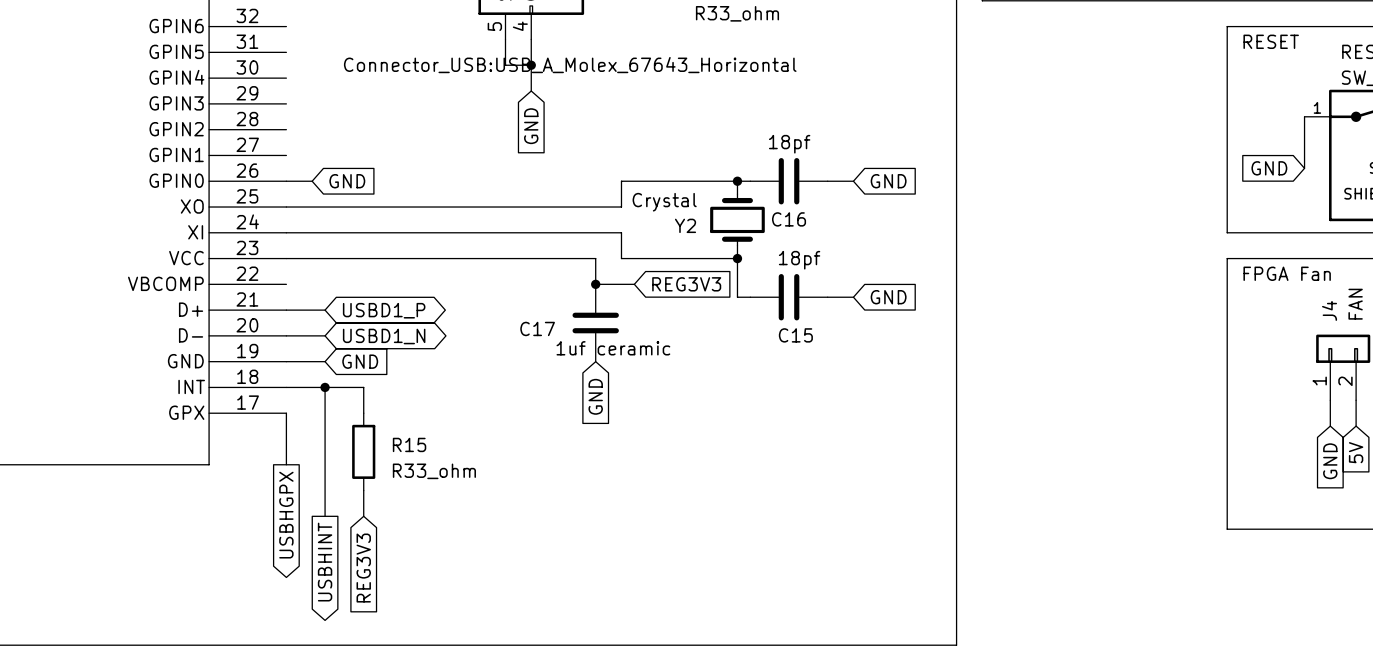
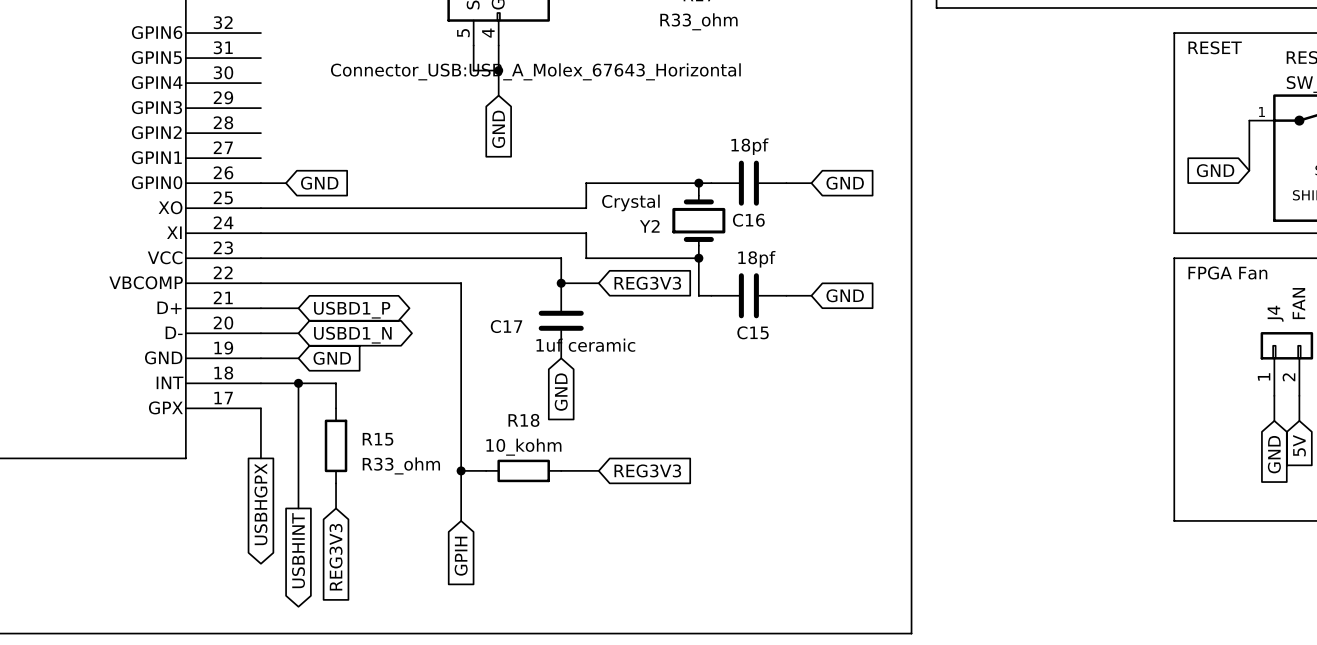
wire: none -> (260, 283) (461, 283) (461, 520)
wire: none -> (461, 470) (486, 470)
junction: none -> (461, 470)
R18: none -> 10_kohm (523, 470)
wire: none -> (561, 470) (598, 470)
global label: none -> REG3V3 (647, 470)
global label: none -> GPIH (461, 556)

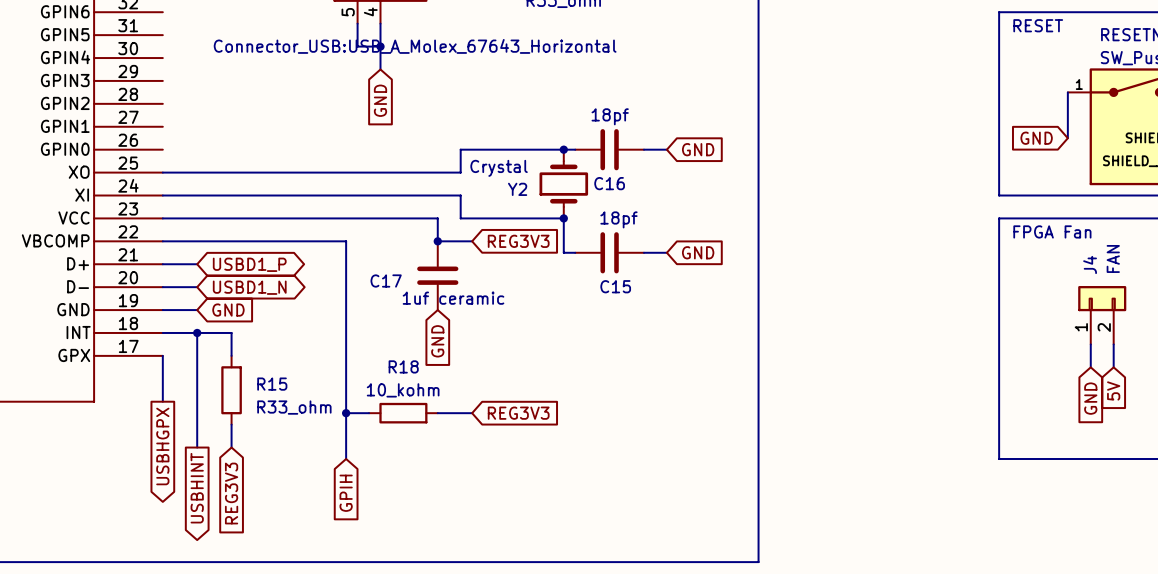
wire: (260, 183) (285, 183) -> none
global label: GND (319, 183) -> none

